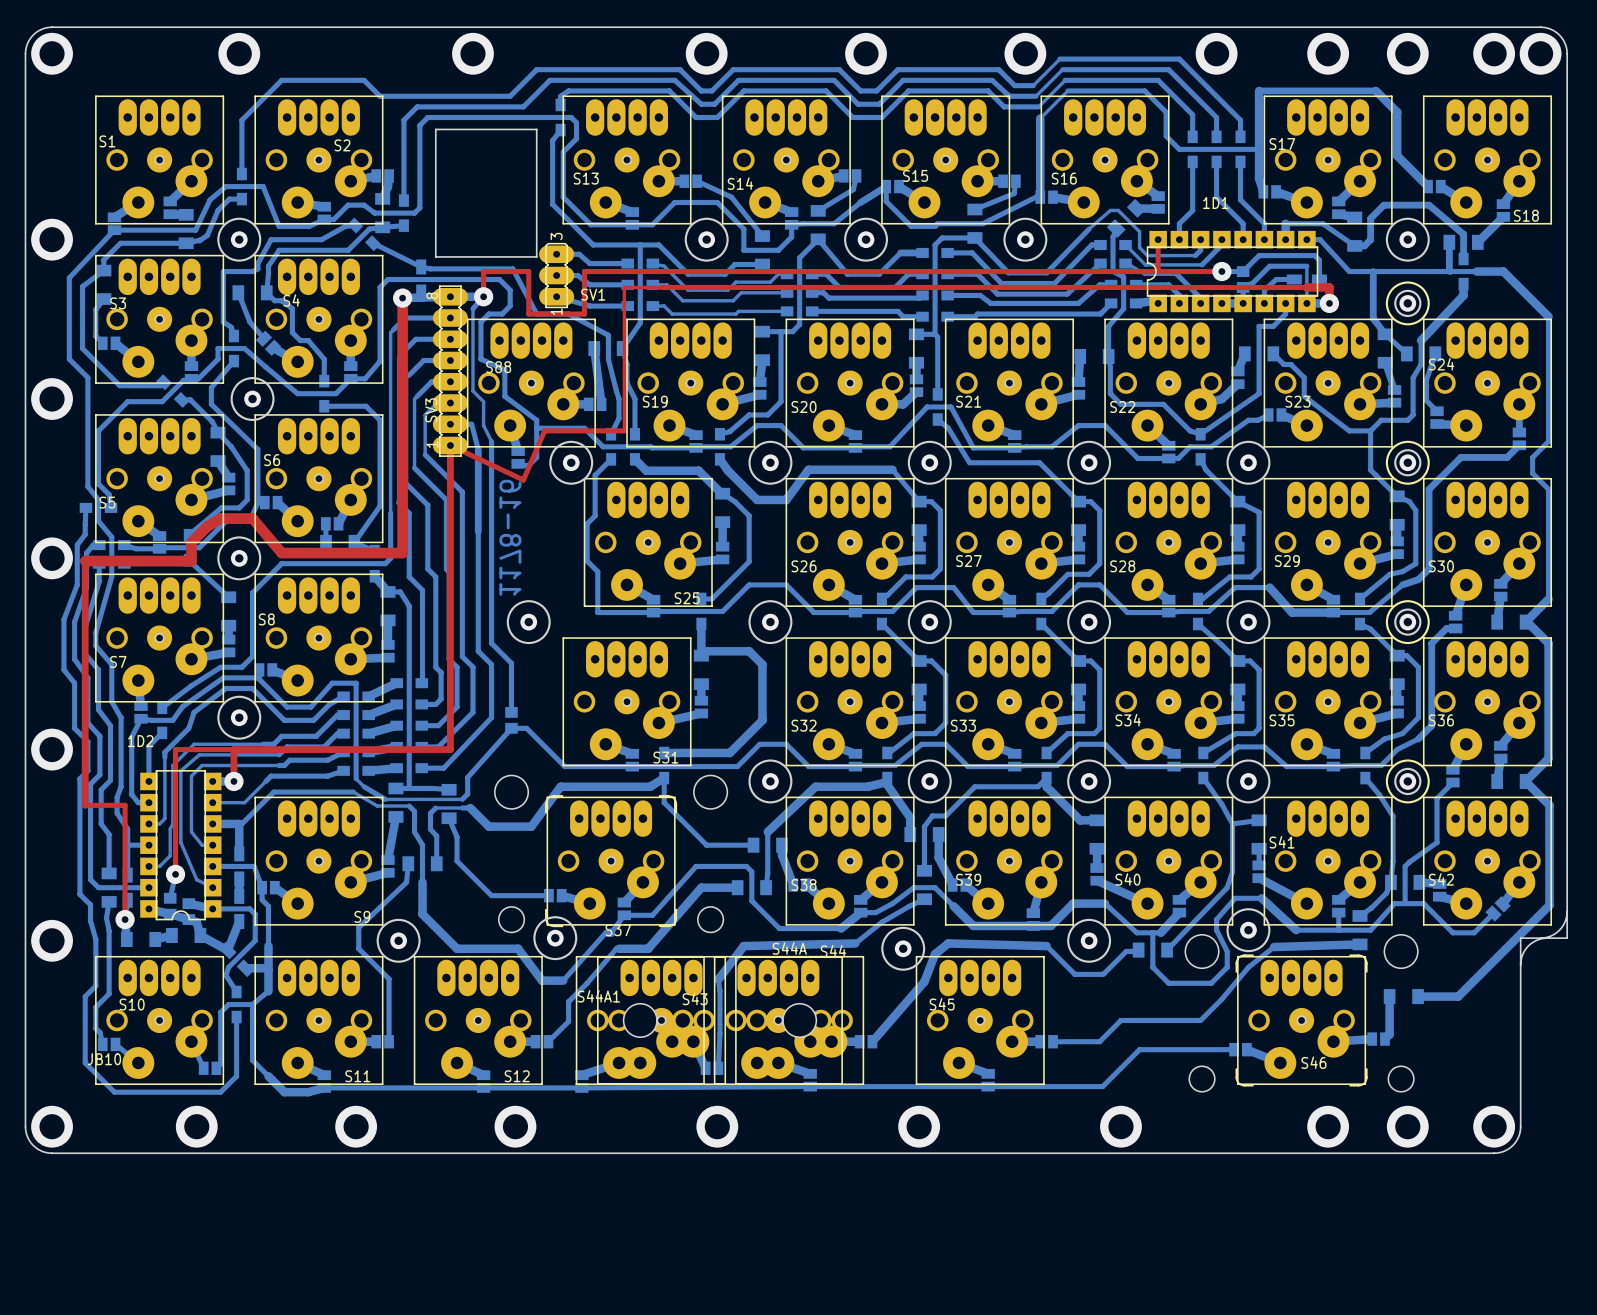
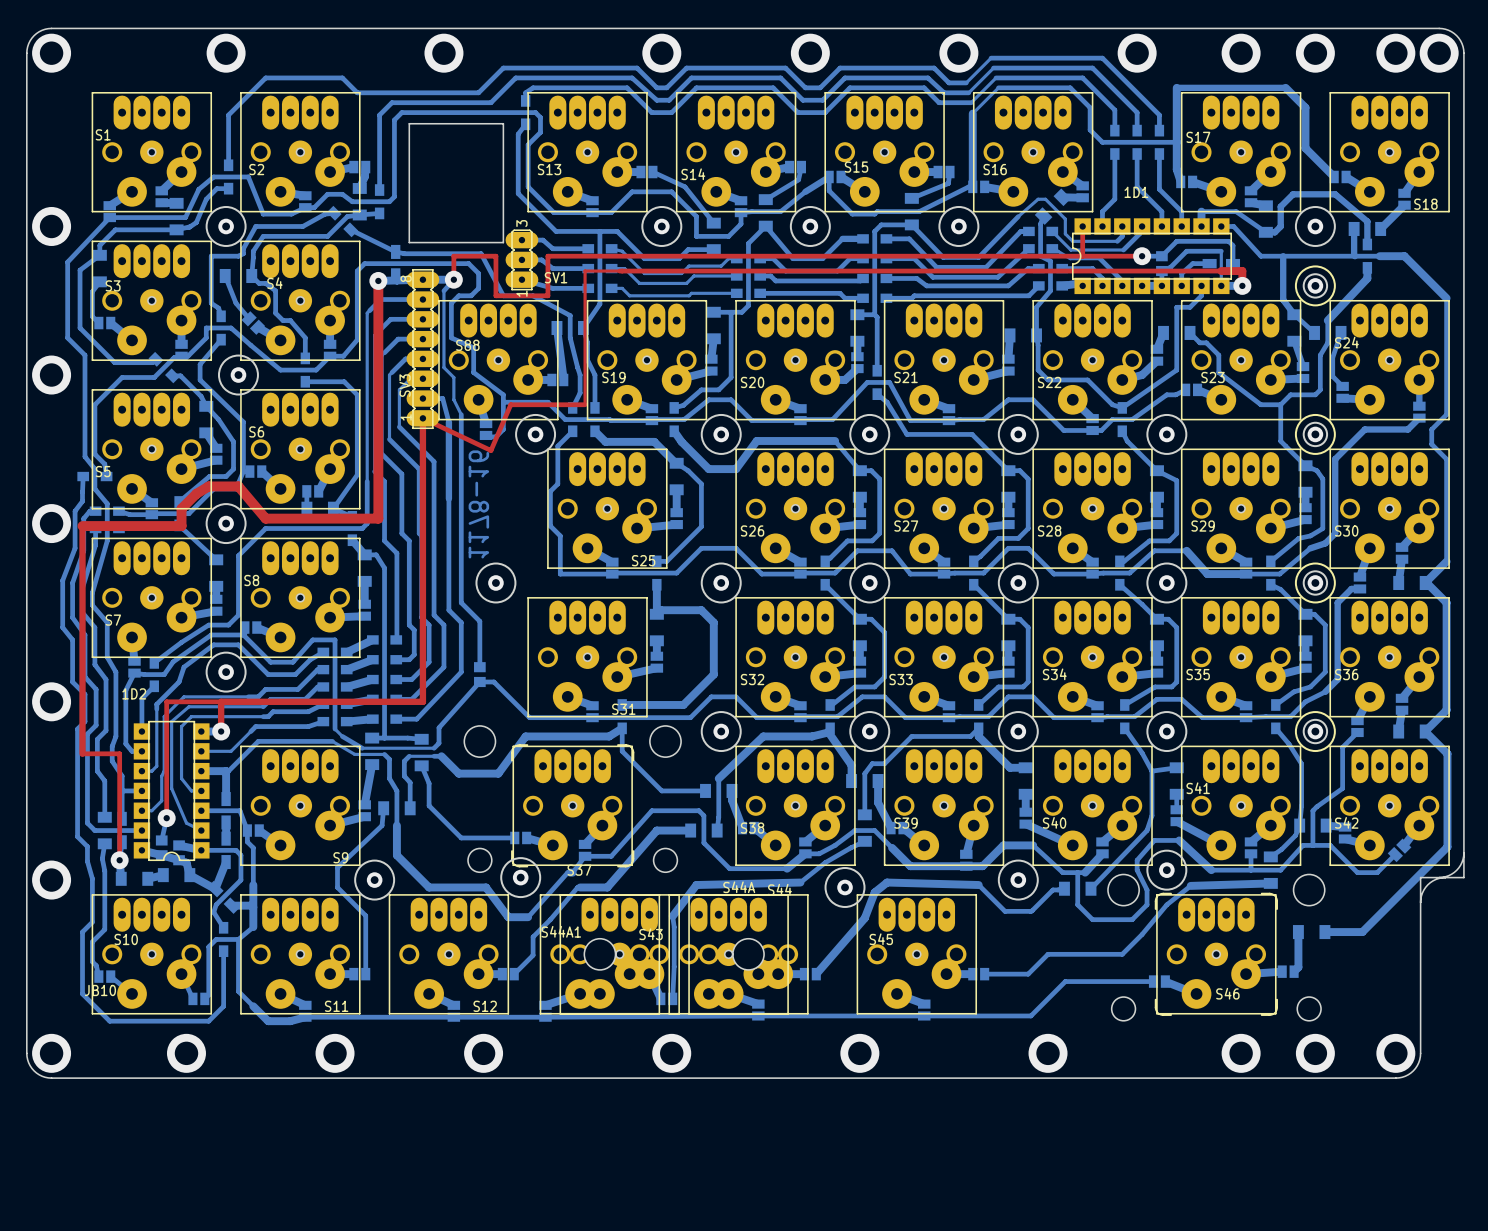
S2 name position: S2 (342, 145) -> S2 (256, 169)

